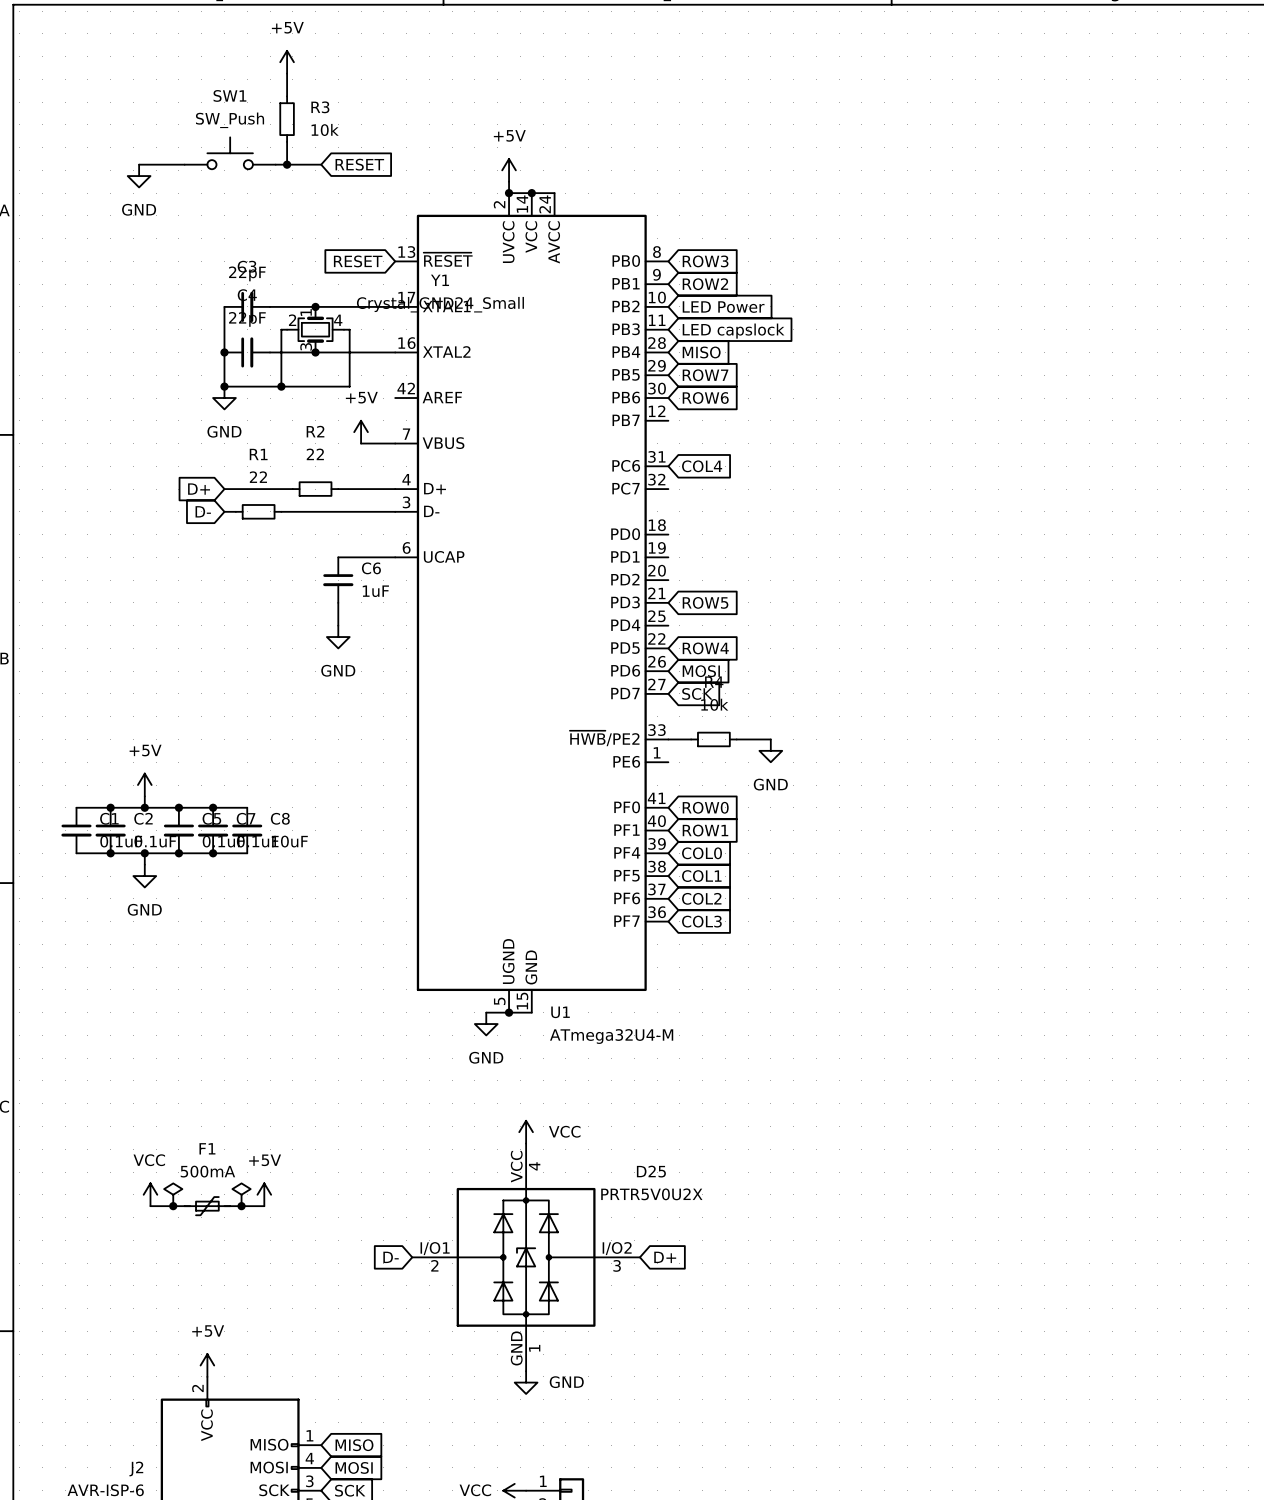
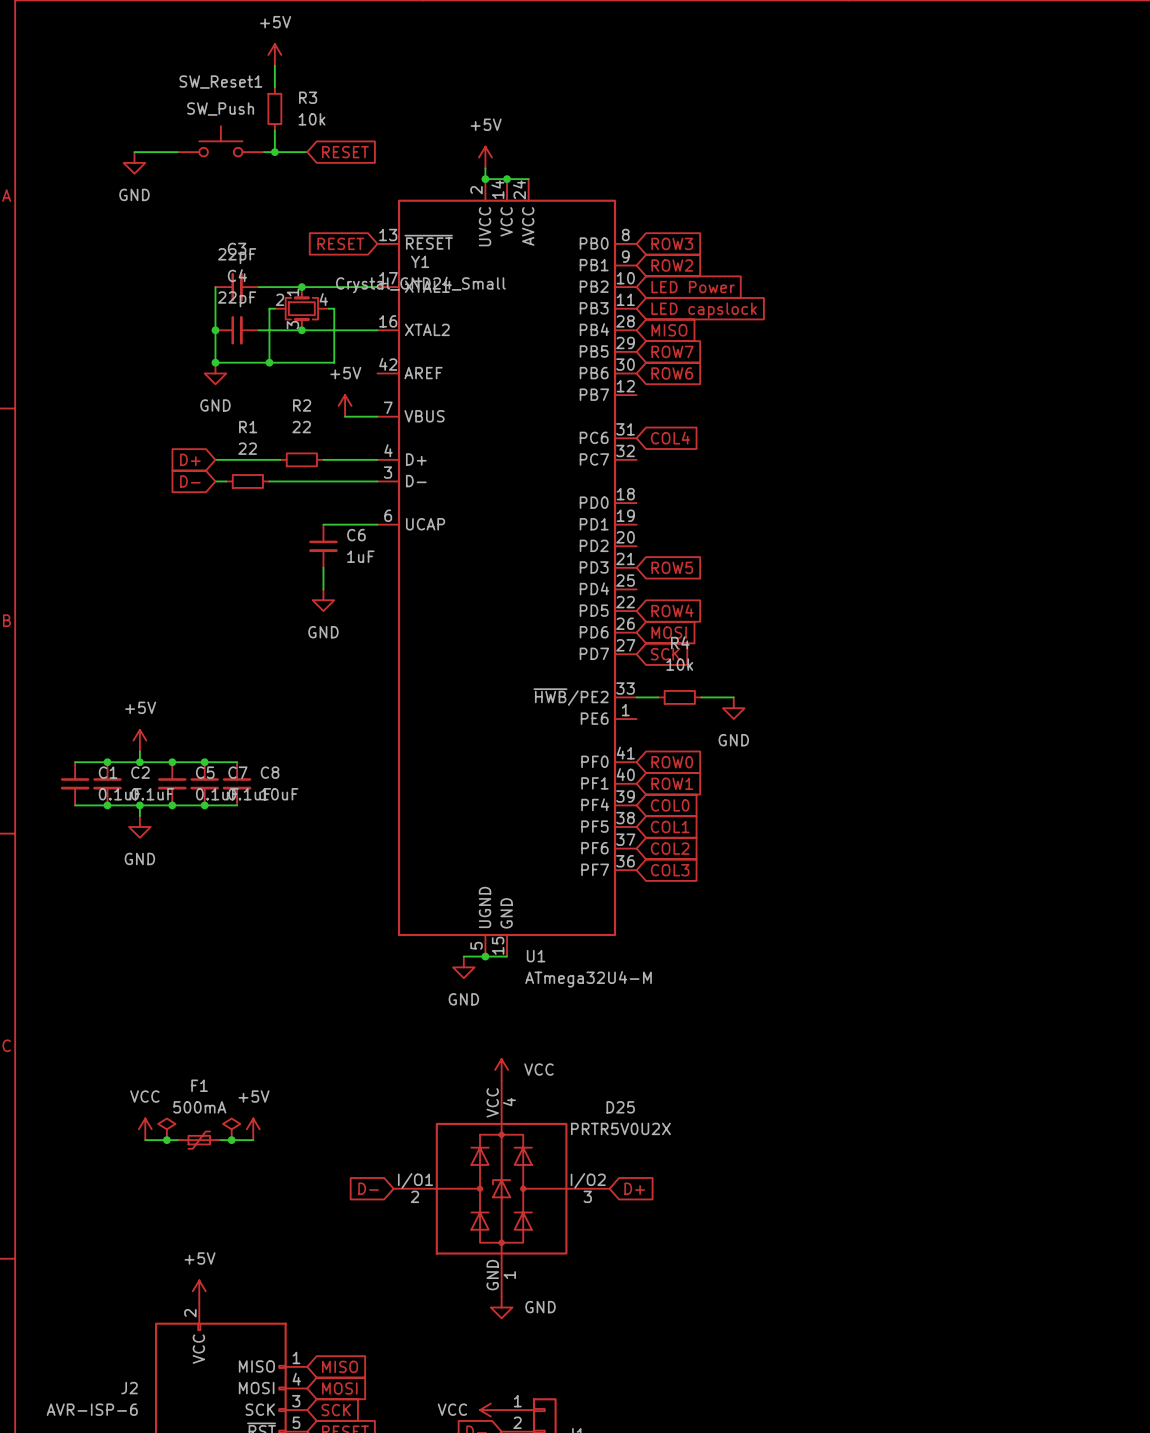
SW1 name: SW1 (229, 95) -> SW_Reset1 (220, 82)

